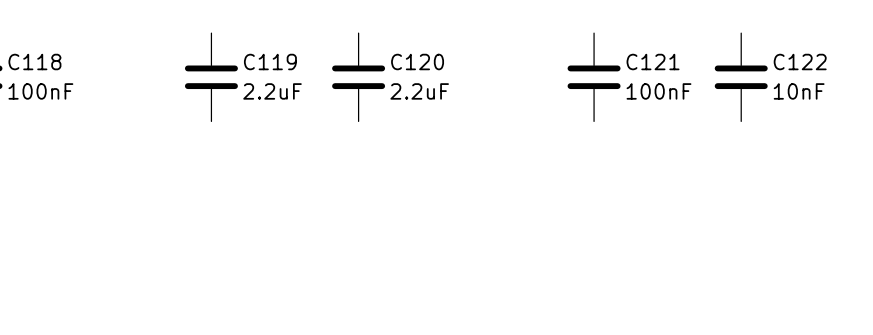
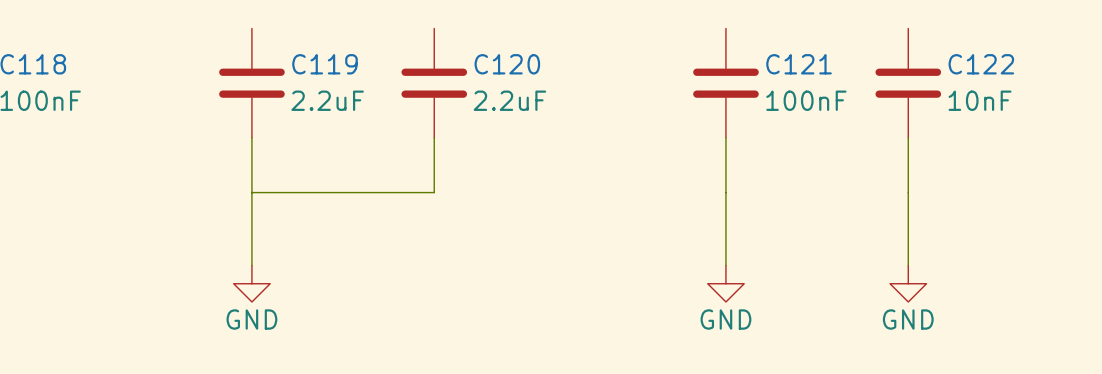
wire: none -> (251, 137) (251, 265)
wire: none -> (434, 137) (434, 192) (251, 192)
wire: none -> (725, 137) (725, 265)
wire: none -> (908, 137) (908, 265)
power symbol: none -> GND (251, 283)
power symbol: none -> GND (725, 283)
power symbol: none -> GND (908, 283)

